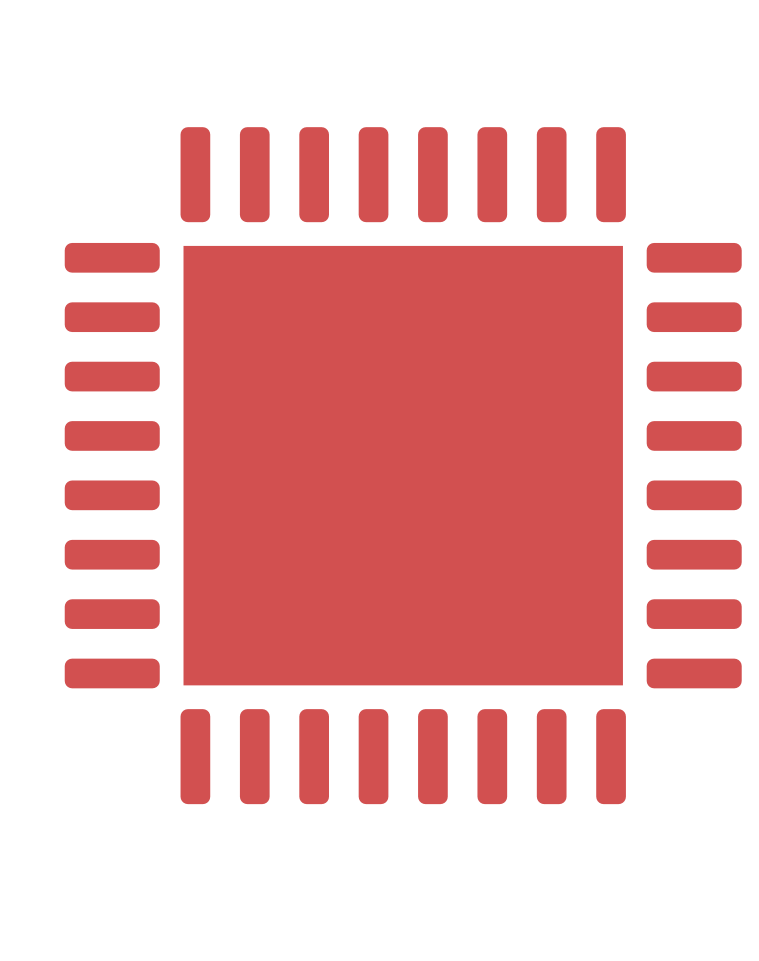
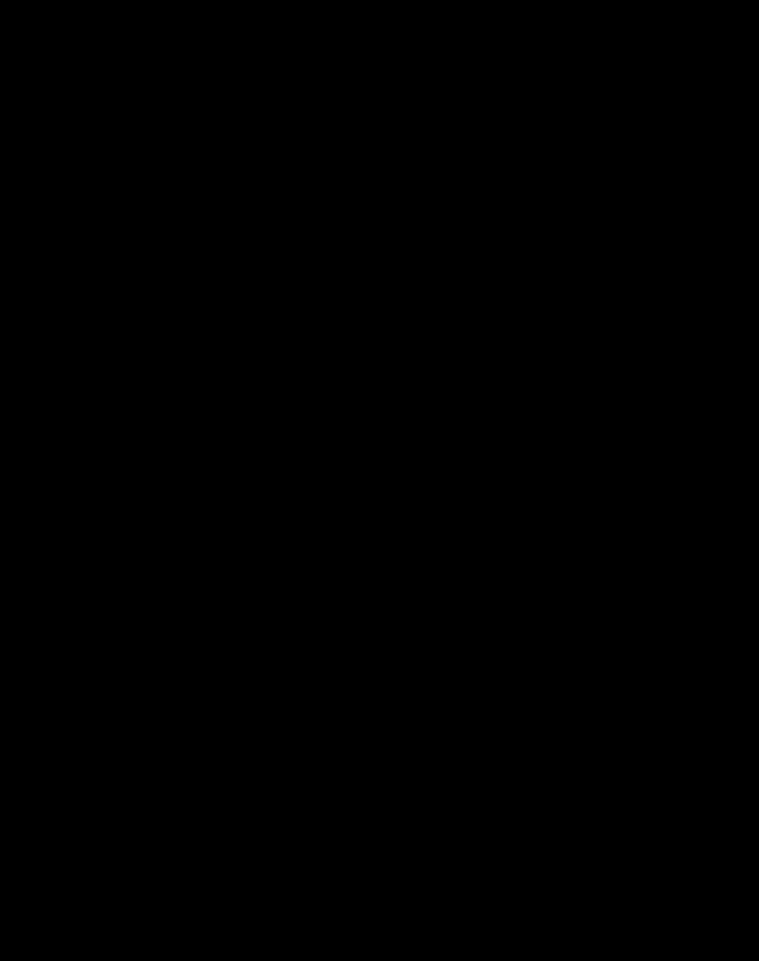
part: (403, 465) -> none

